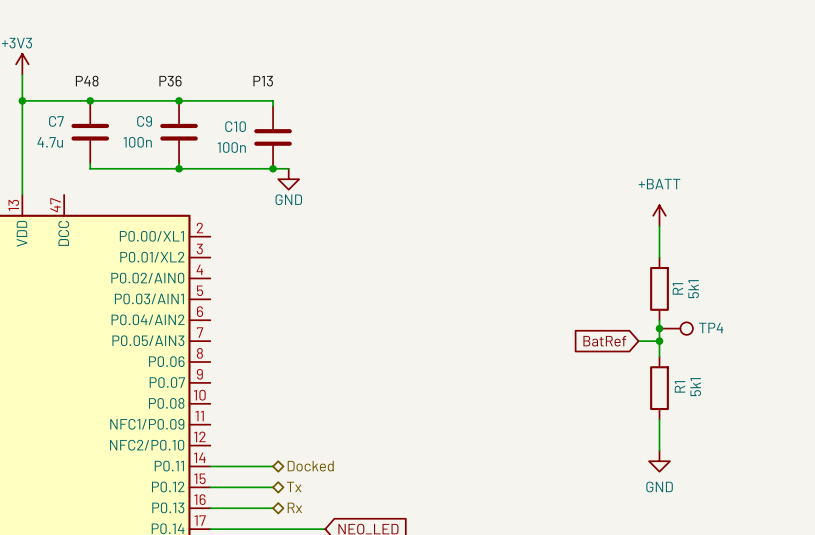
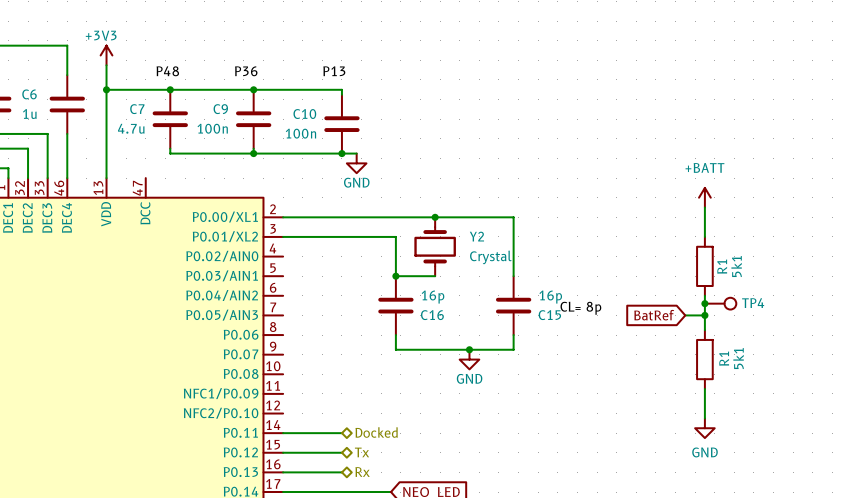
wire: none -> (283, 217) (513, 217) (513, 276)
junction: none -> (435, 217)
wire: none -> (283, 236) (395, 236) (395, 276) (435, 276)
Y2: none -> Crystal (435, 246)
junction: none -> (395, 276)
C16: none -> 16p (395, 305)
C15: none -> 16p (513, 305)
label: none -> CL= 8p (580, 308)
wire: none -> (395, 335) (395, 349) (513, 349) (513, 335)
junction: none -> (469, 349)
power symbol: none -> GND (469, 359)

